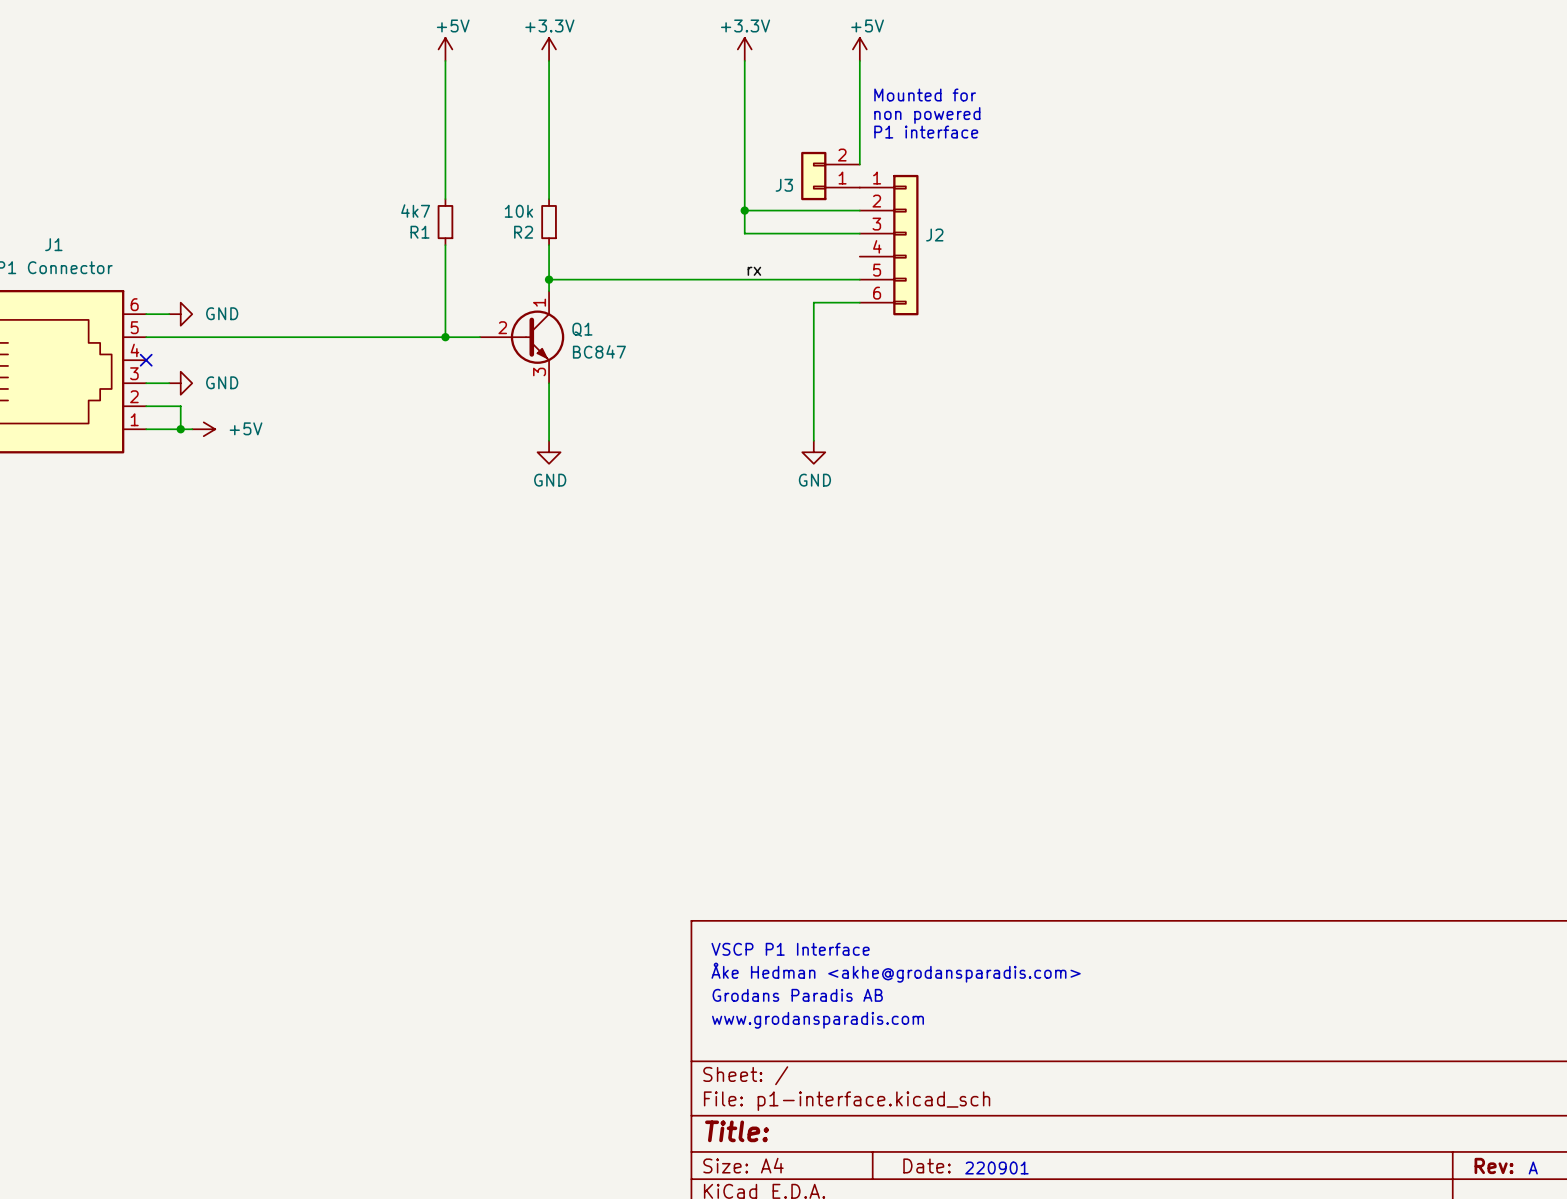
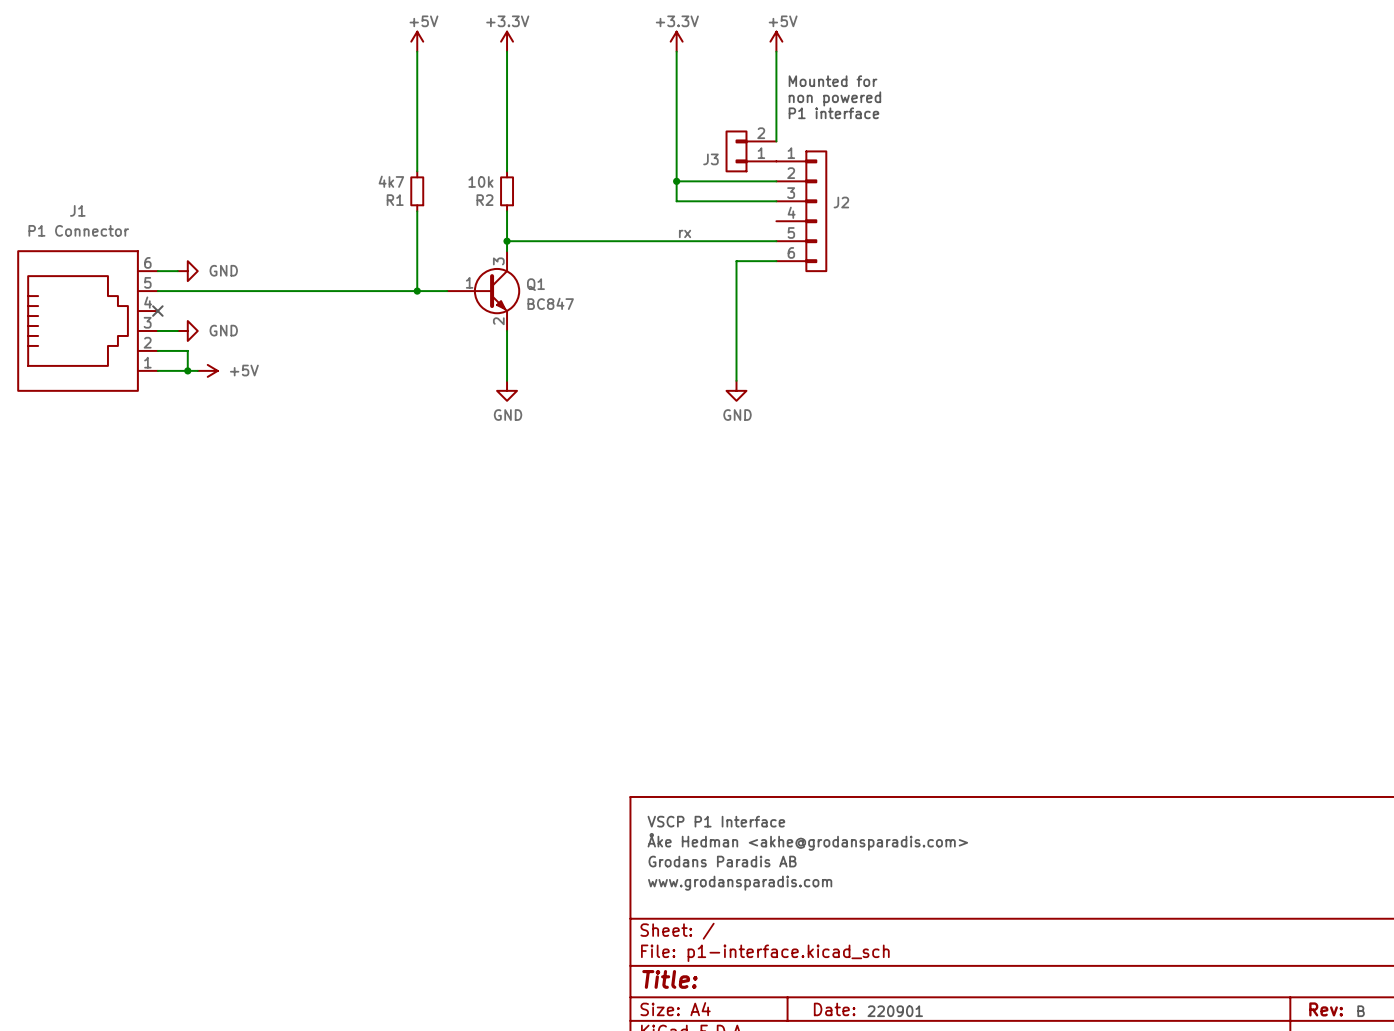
Q1 symbol: [479, 291, 565, 384] -> [447, 251, 521, 331]
text: A (1533, 1168) -> B (1361, 1011)

